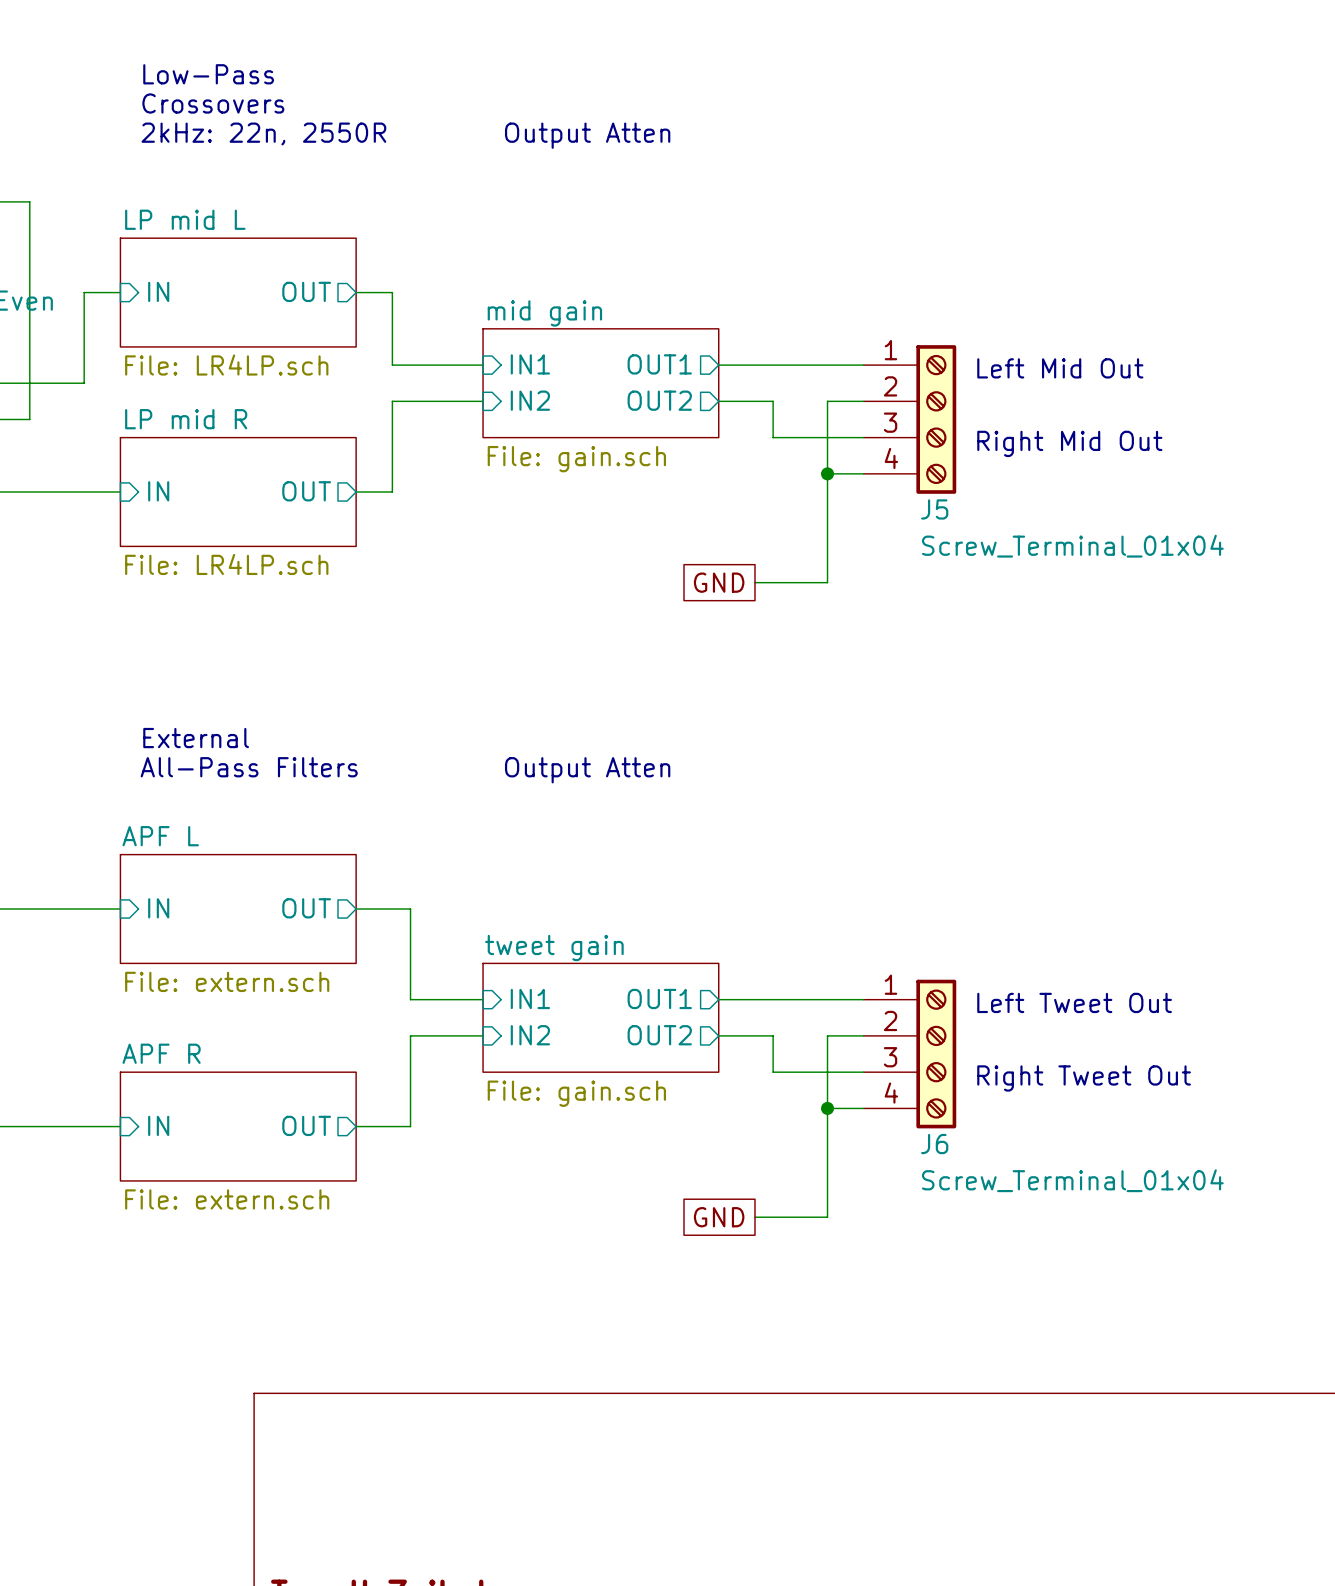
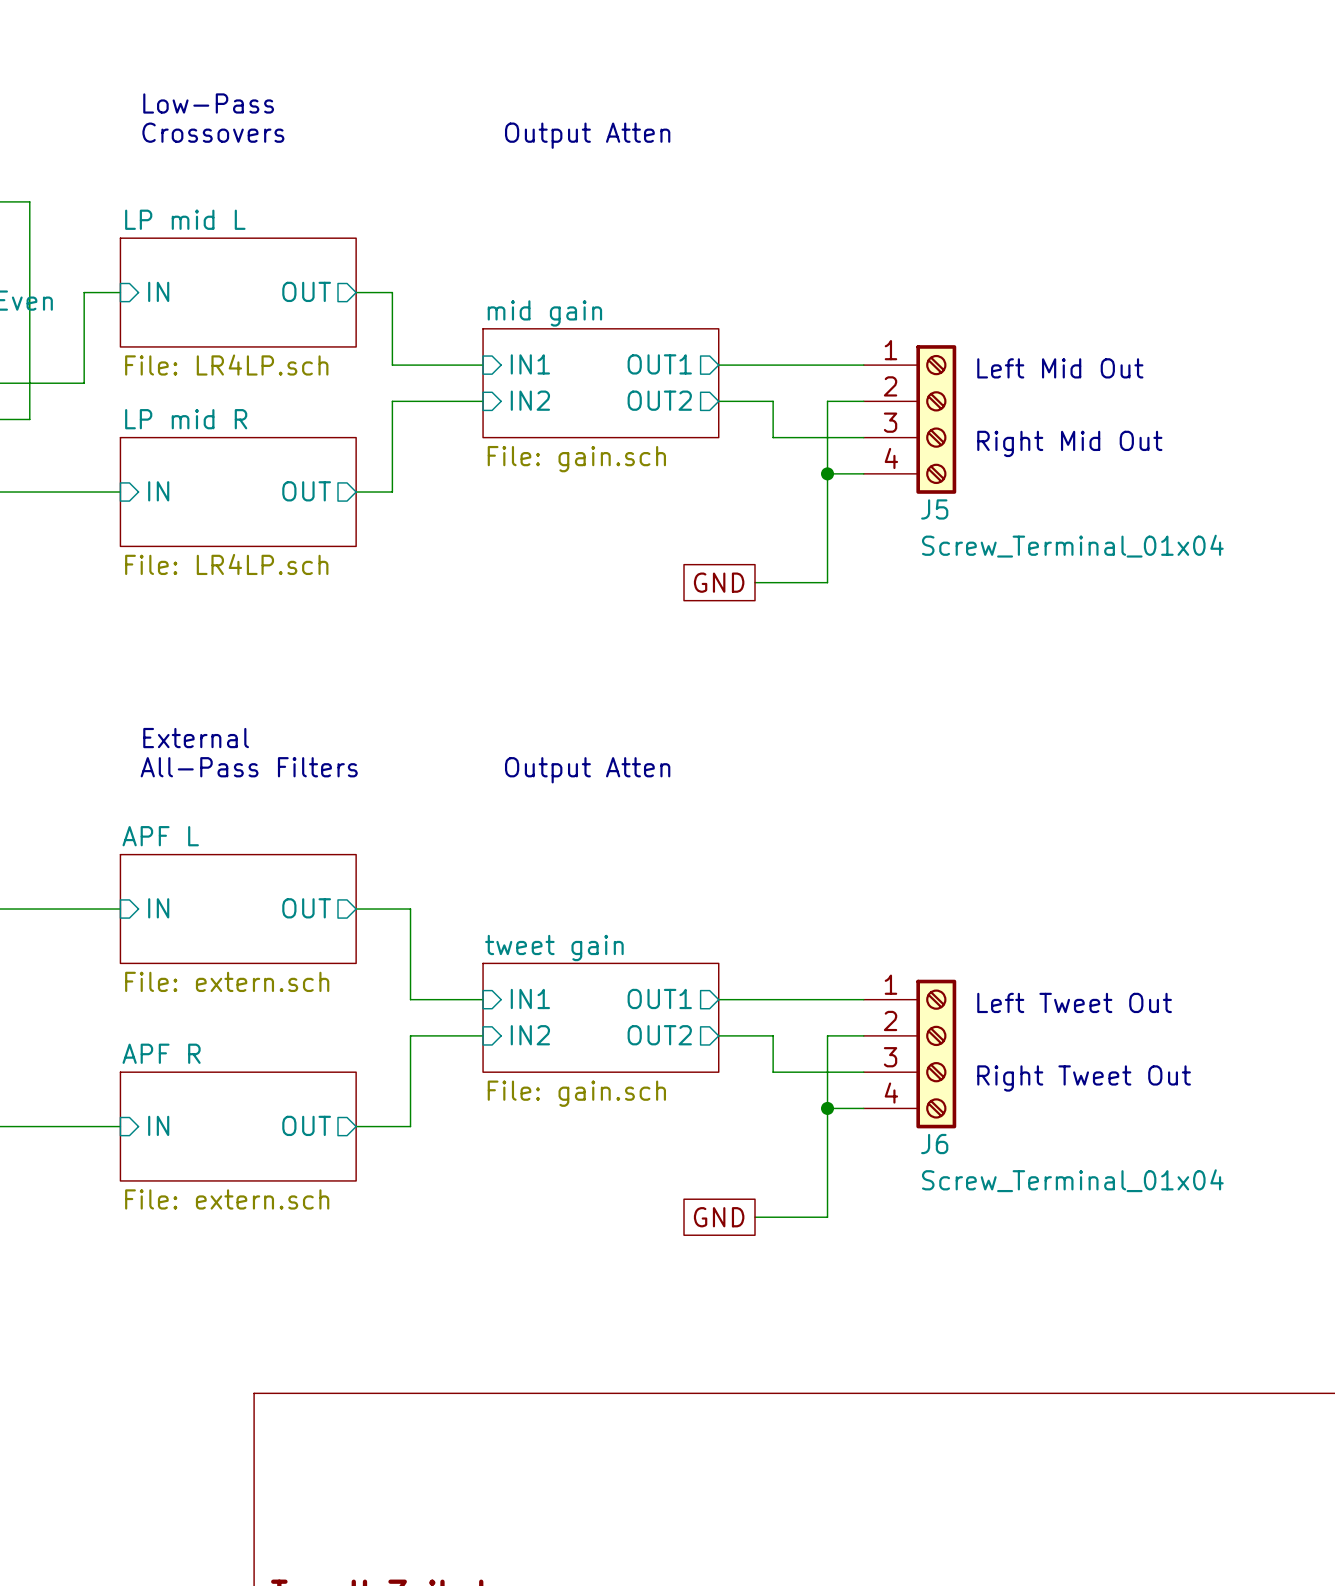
text: Low-Pass (208, 74) -> none
text: Crossovers (213, 103) -> Low-Pass (208, 103)
text: 2kHz: 22n, 2550R (263, 133) -> Crossovers (213, 132)

